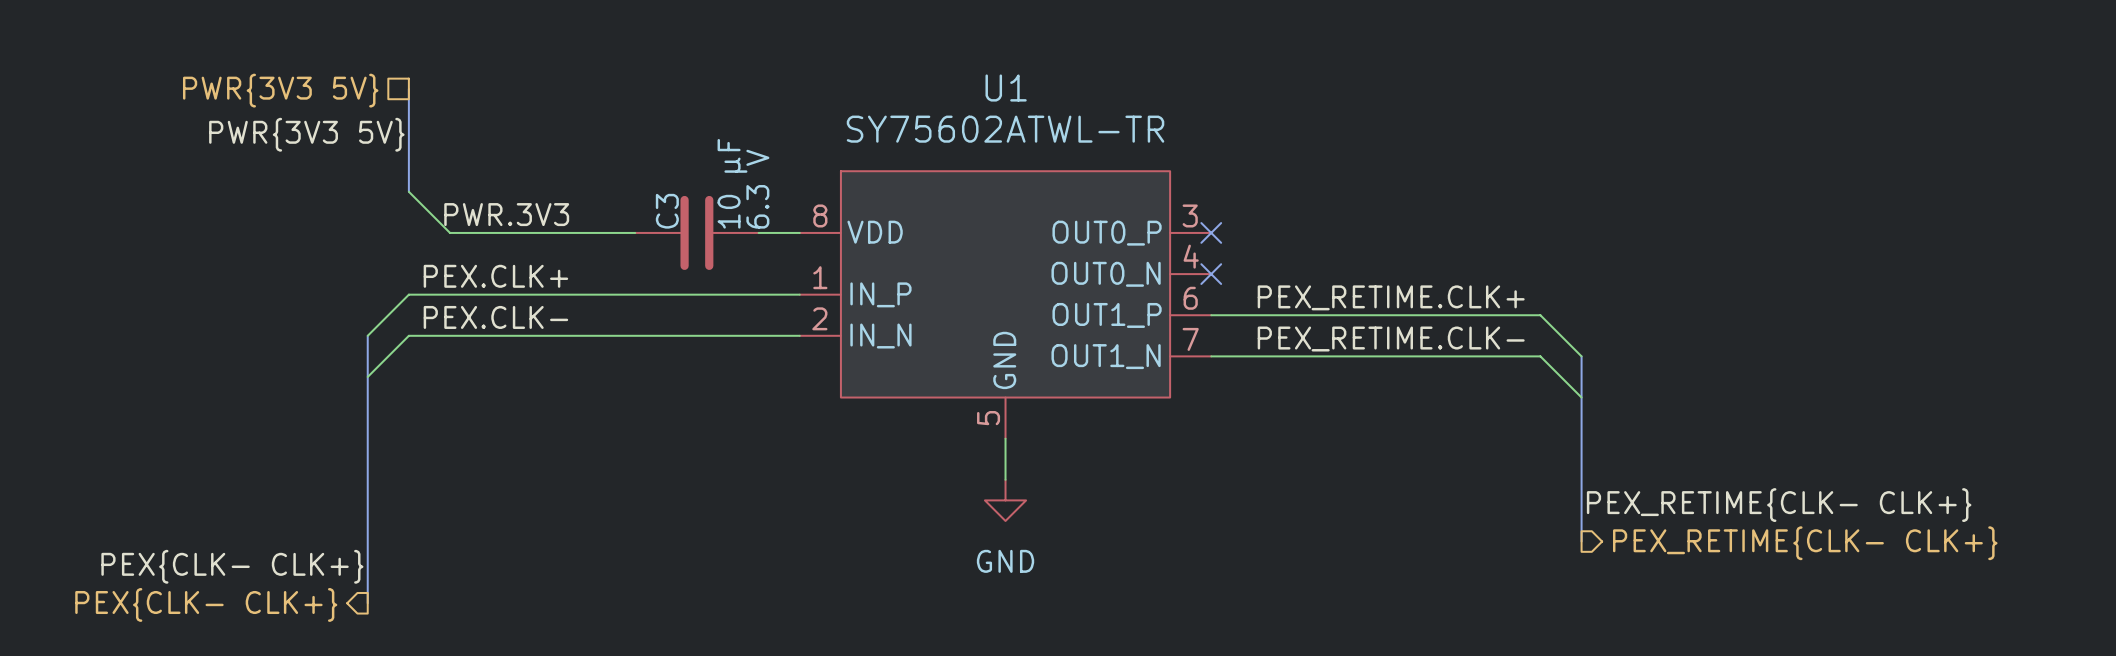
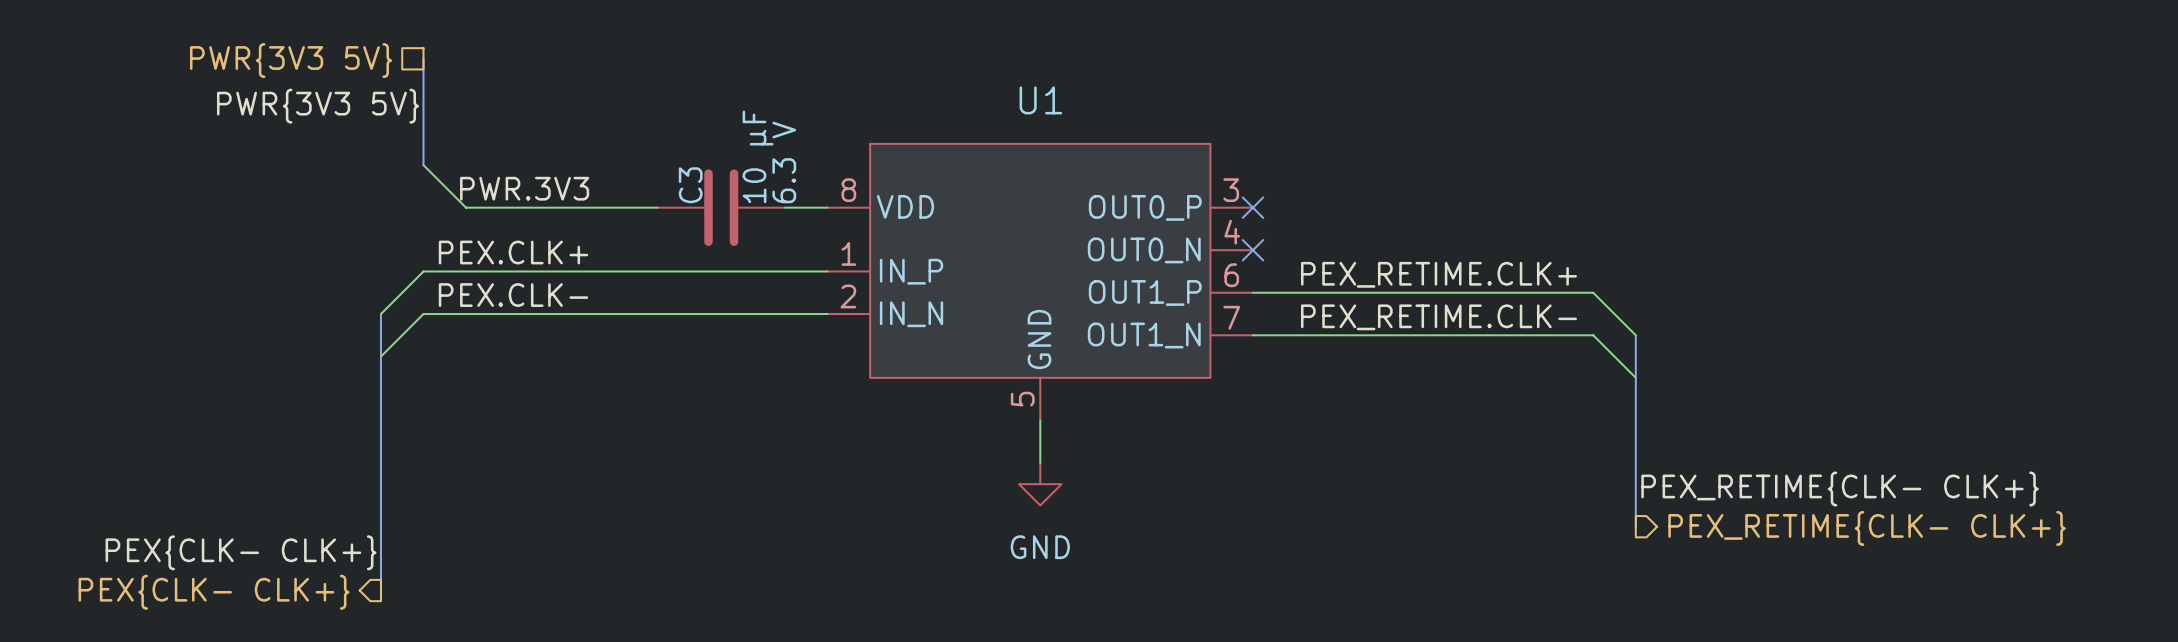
U1 name position: U1 (1006, 88) -> U1 (1040, 100)
U1 value: SY75602ATWL-TR (1005, 129) -> none

